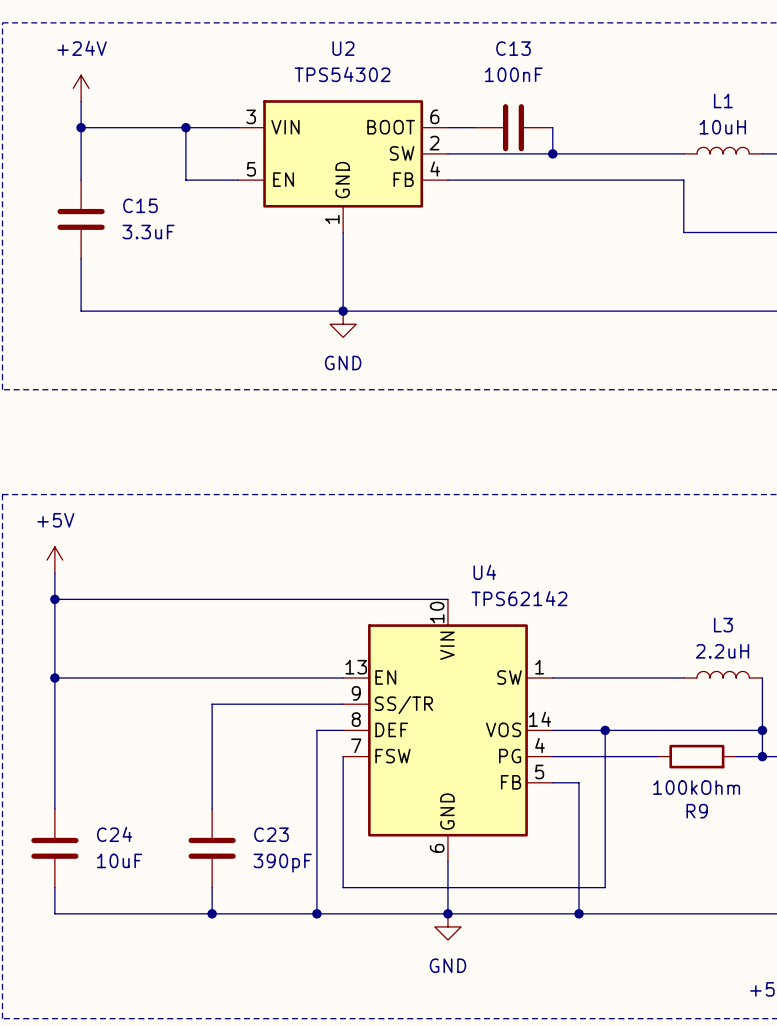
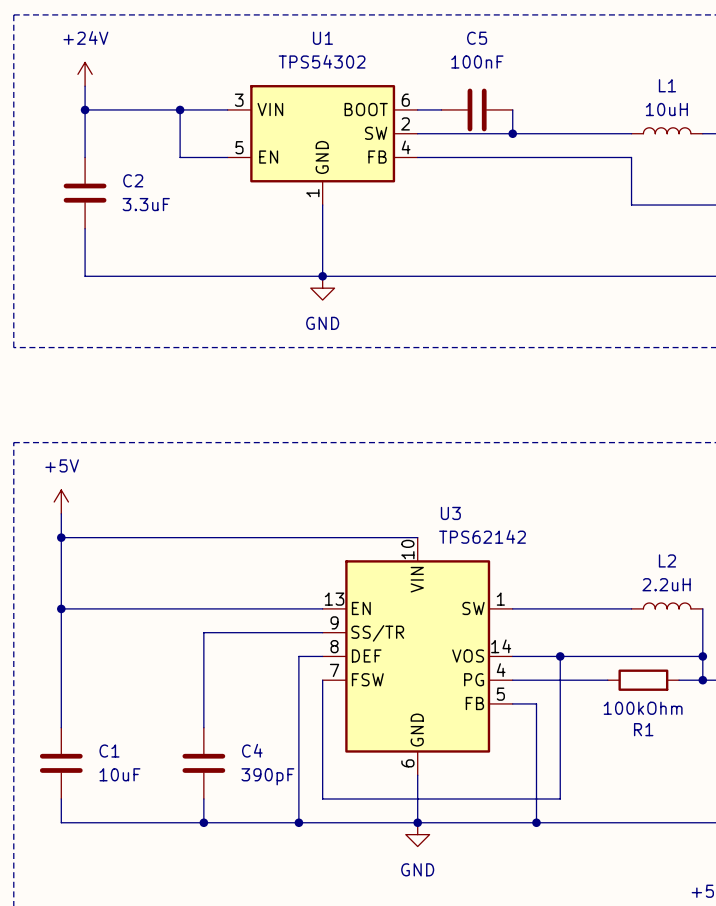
U2 name: U2 (343, 48) -> U1 (322, 38)
C13 name: C13 (513, 48) -> C5 (477, 38)
C15 name: C15 (140, 205) -> C2 (133, 180)
U4 name: U4 (484, 572) -> U3 (450, 513)
L3 name: L3 (723, 625) -> L2 (667, 560)
R9 name: R9 (697, 811) -> R1 (643, 729)
C24 name: C24 (114, 834) -> C1 (109, 751)
C23 name: C23 (271, 834) -> C4 (252, 750)

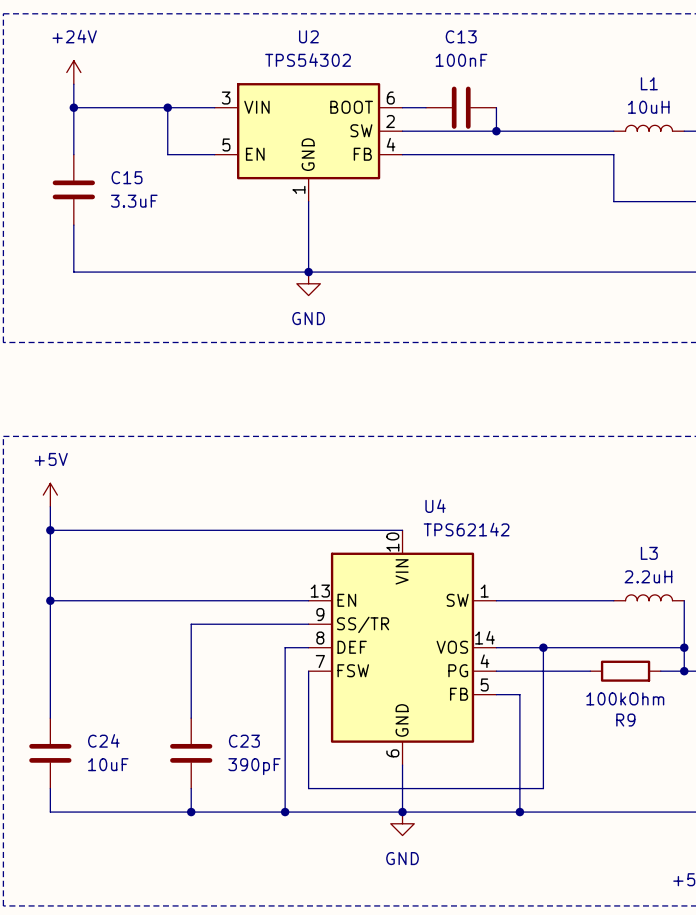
U1 name: U1 (322, 38) -> U2 (308, 36)
C5 name: C5 (477, 38) -> C13 (461, 36)
C2 name: C2 (133, 180) -> C15 (127, 177)
U3 name: U3 (450, 513) -> U4 (435, 506)
L2 name: L2 (667, 560) -> L3 (649, 553)
R1 name: R1 (643, 729) -> R9 (625, 720)
C4 name: C4 (252, 750) -> C23 (244, 741)
C1 name: C1 (109, 751) -> C24 (103, 740)

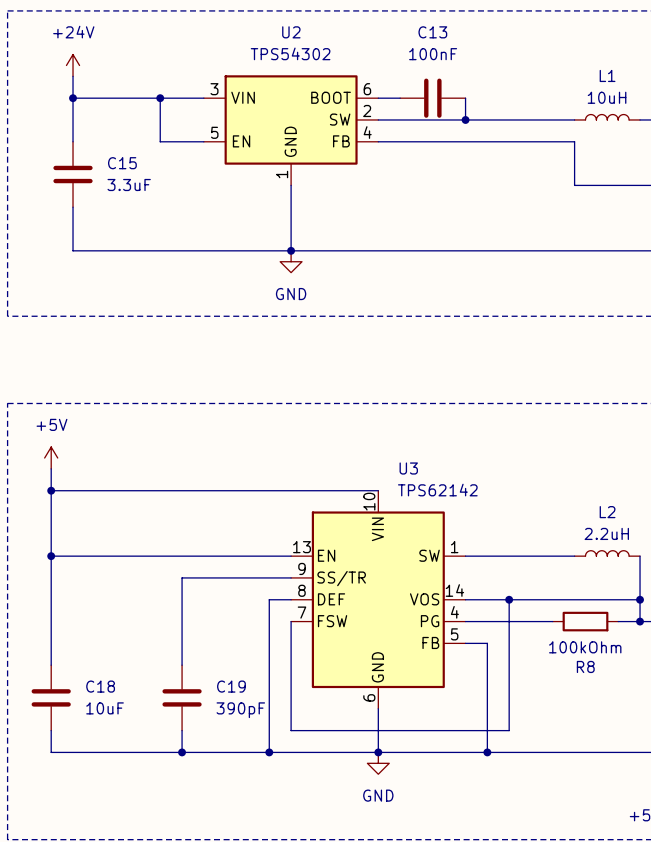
U4 name: U4 (435, 506) -> U3 (408, 468)
L3 name: L3 (649, 553) -> L2 (607, 512)
R9 name: R9 (625, 720) -> R8 (585, 666)
C24 name: C24 (103, 740) -> C18 (100, 686)
C23 name: C23 (244, 741) -> C19 (231, 686)

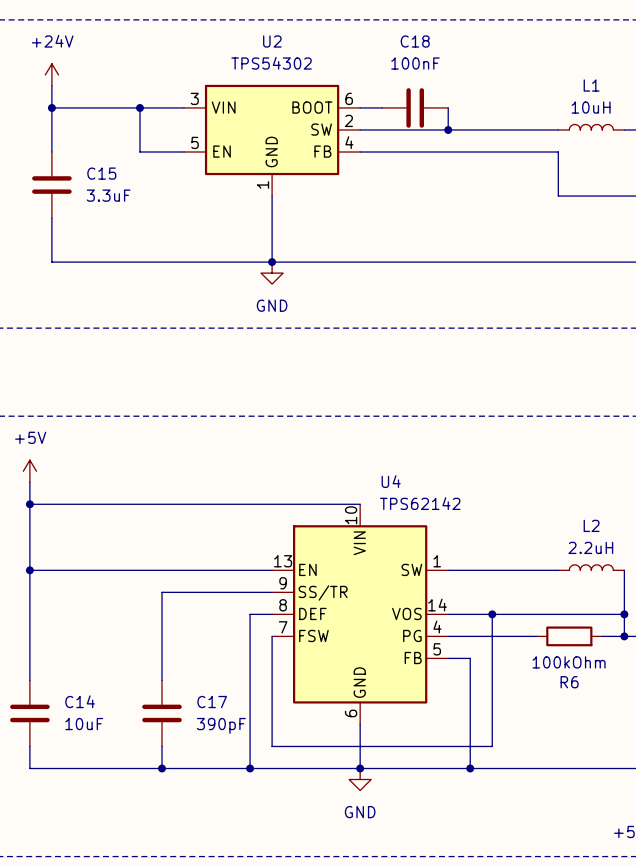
C13 name: C13 (432, 32) -> C18 (415, 41)
U3 name: U3 (408, 468) -> U4 (391, 481)
R8 name: R8 (585, 666) -> R6 (569, 682)
C18 name: C18 (100, 686) -> C14 (80, 701)
C19 name: C19 (231, 686) -> C17 (212, 702)

